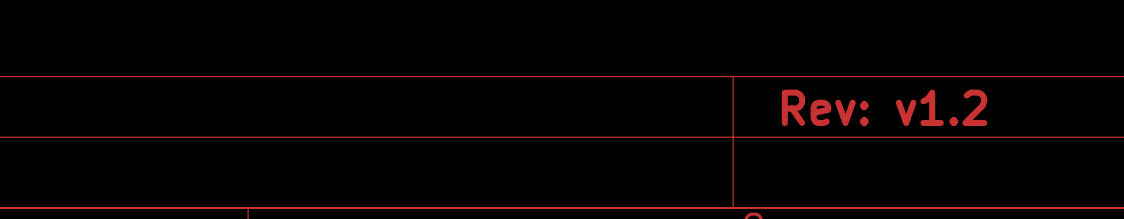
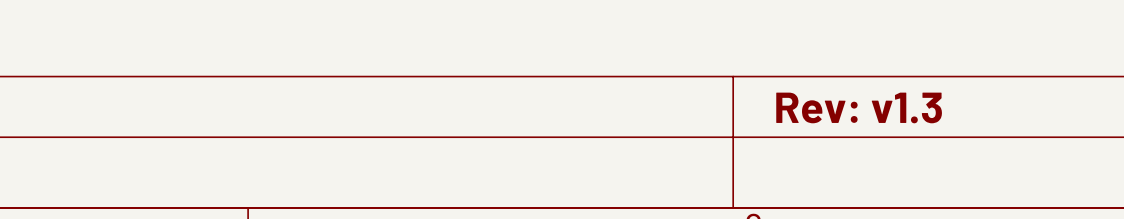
title block: Rev: v1.2 (884, 107) -> Rev: v1.3 (859, 107)

